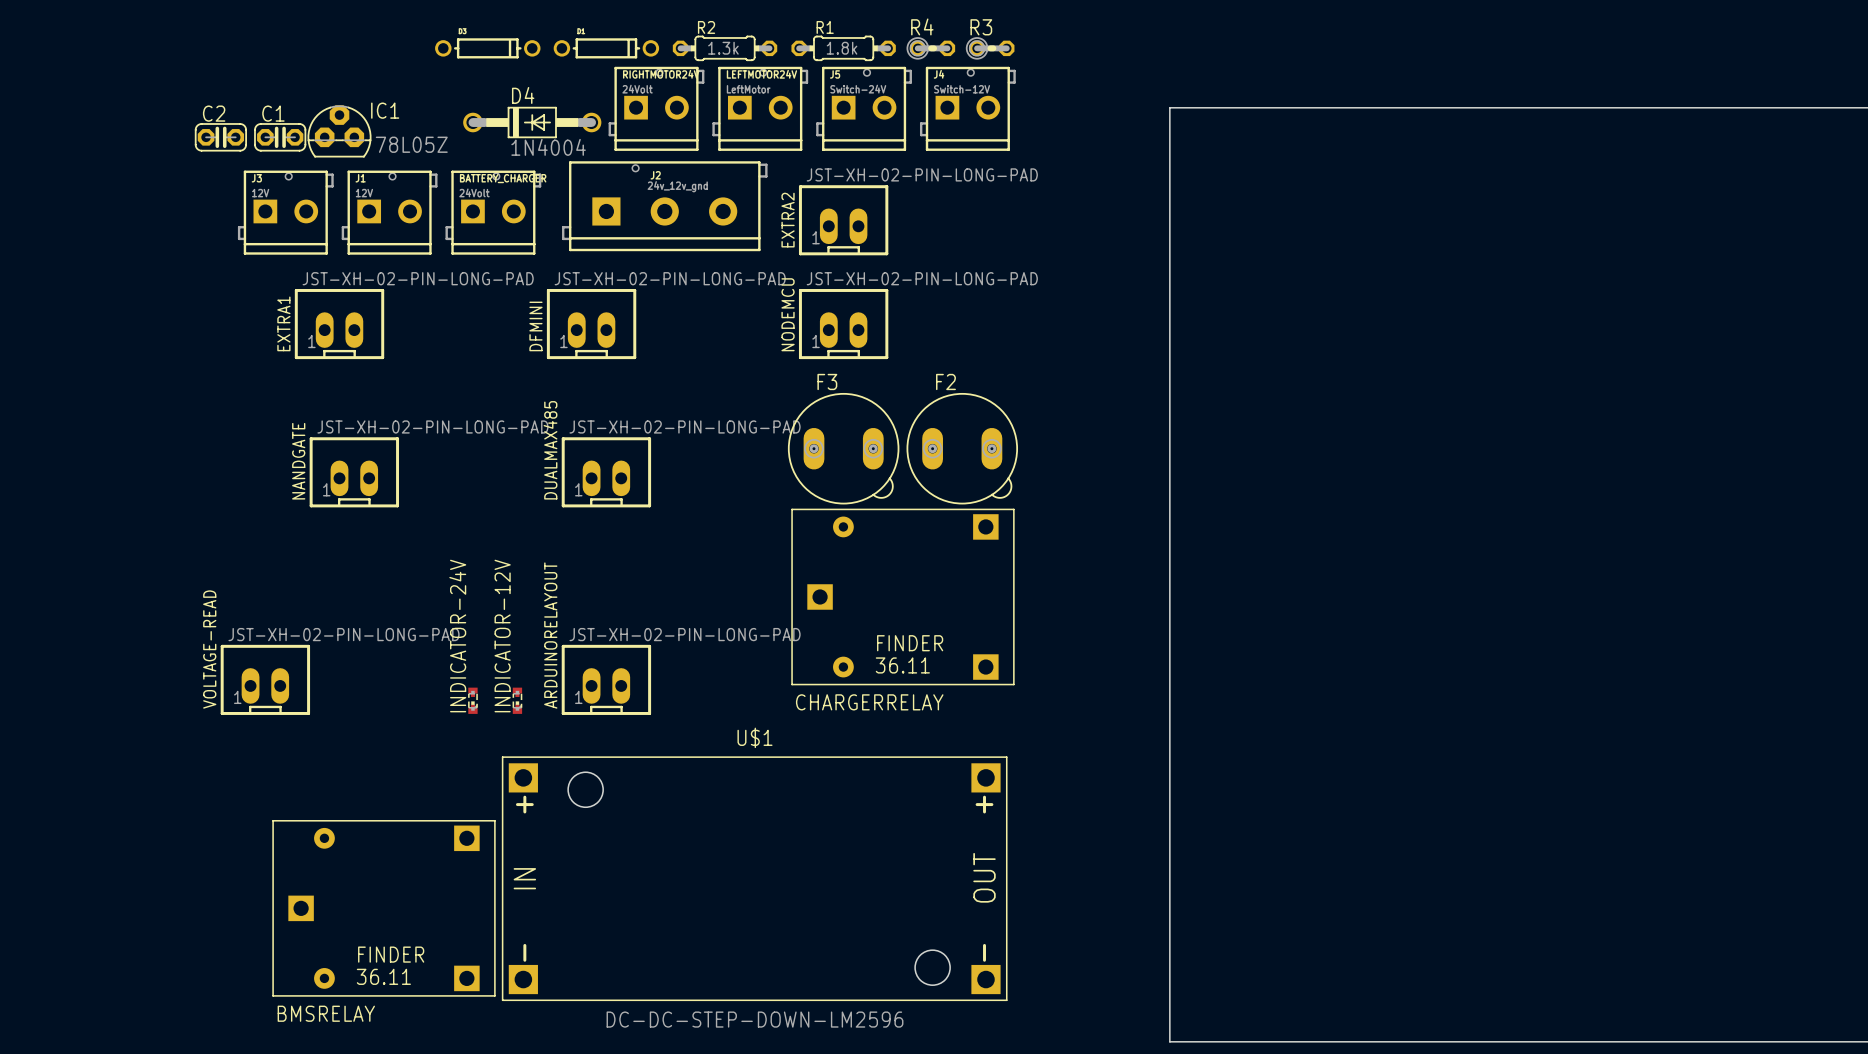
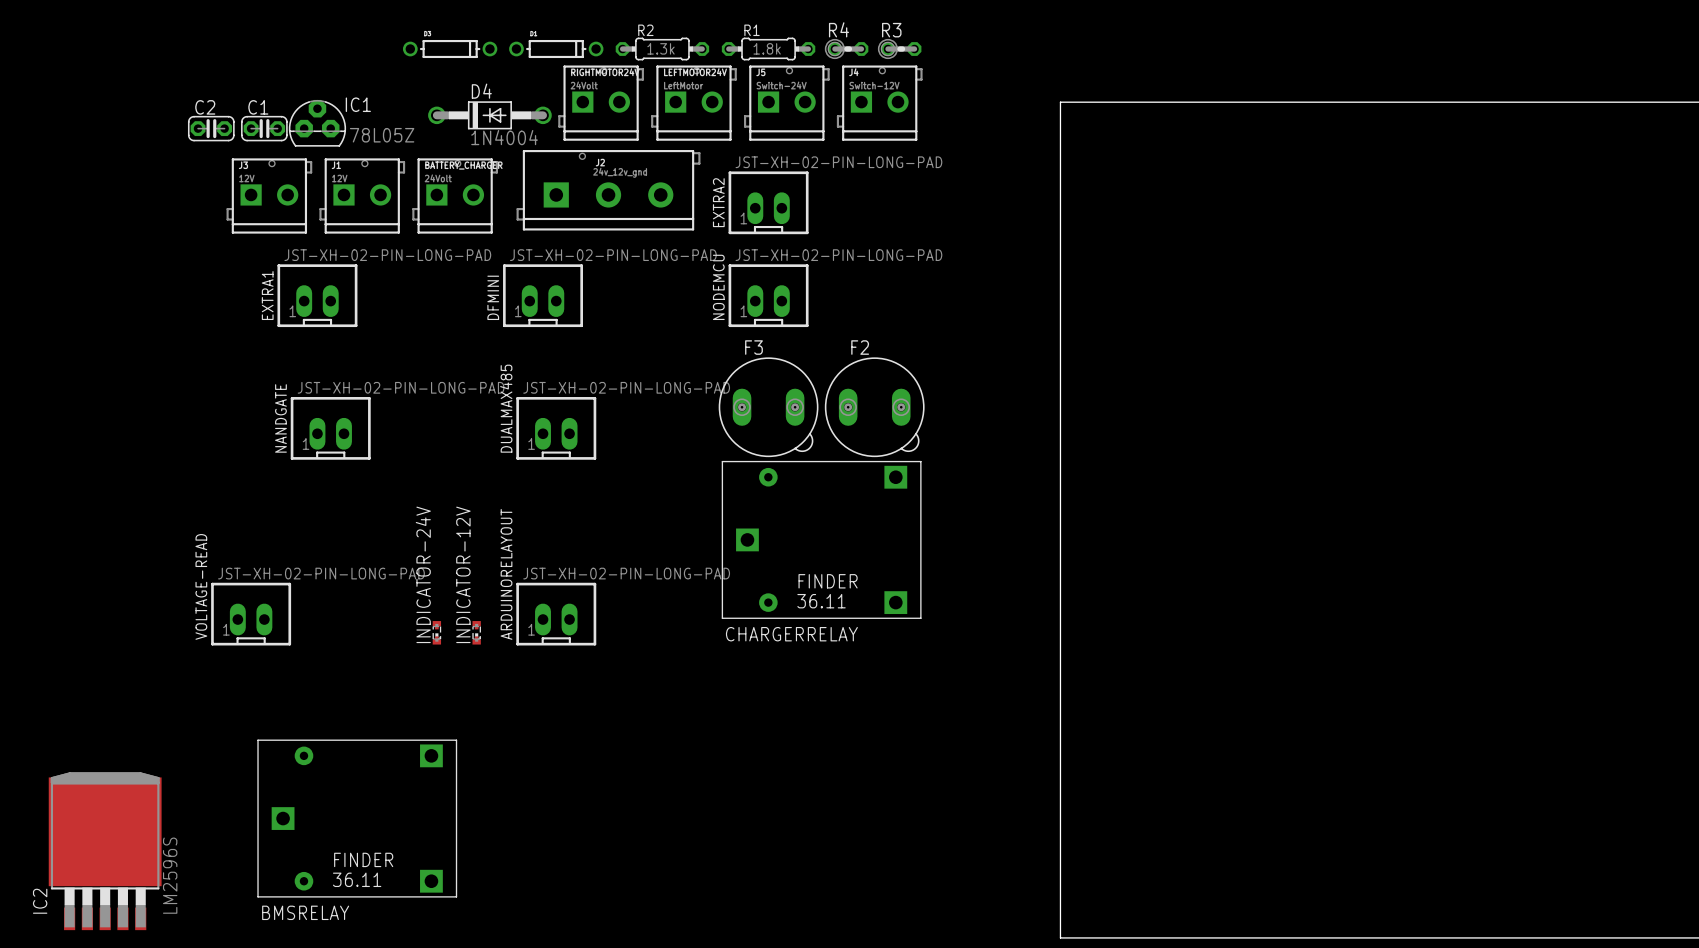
U$1: DC-DC-STEP-DOWN-LM2596 (754, 878) -> none
IC2: none -> LM2596S (105, 851)

